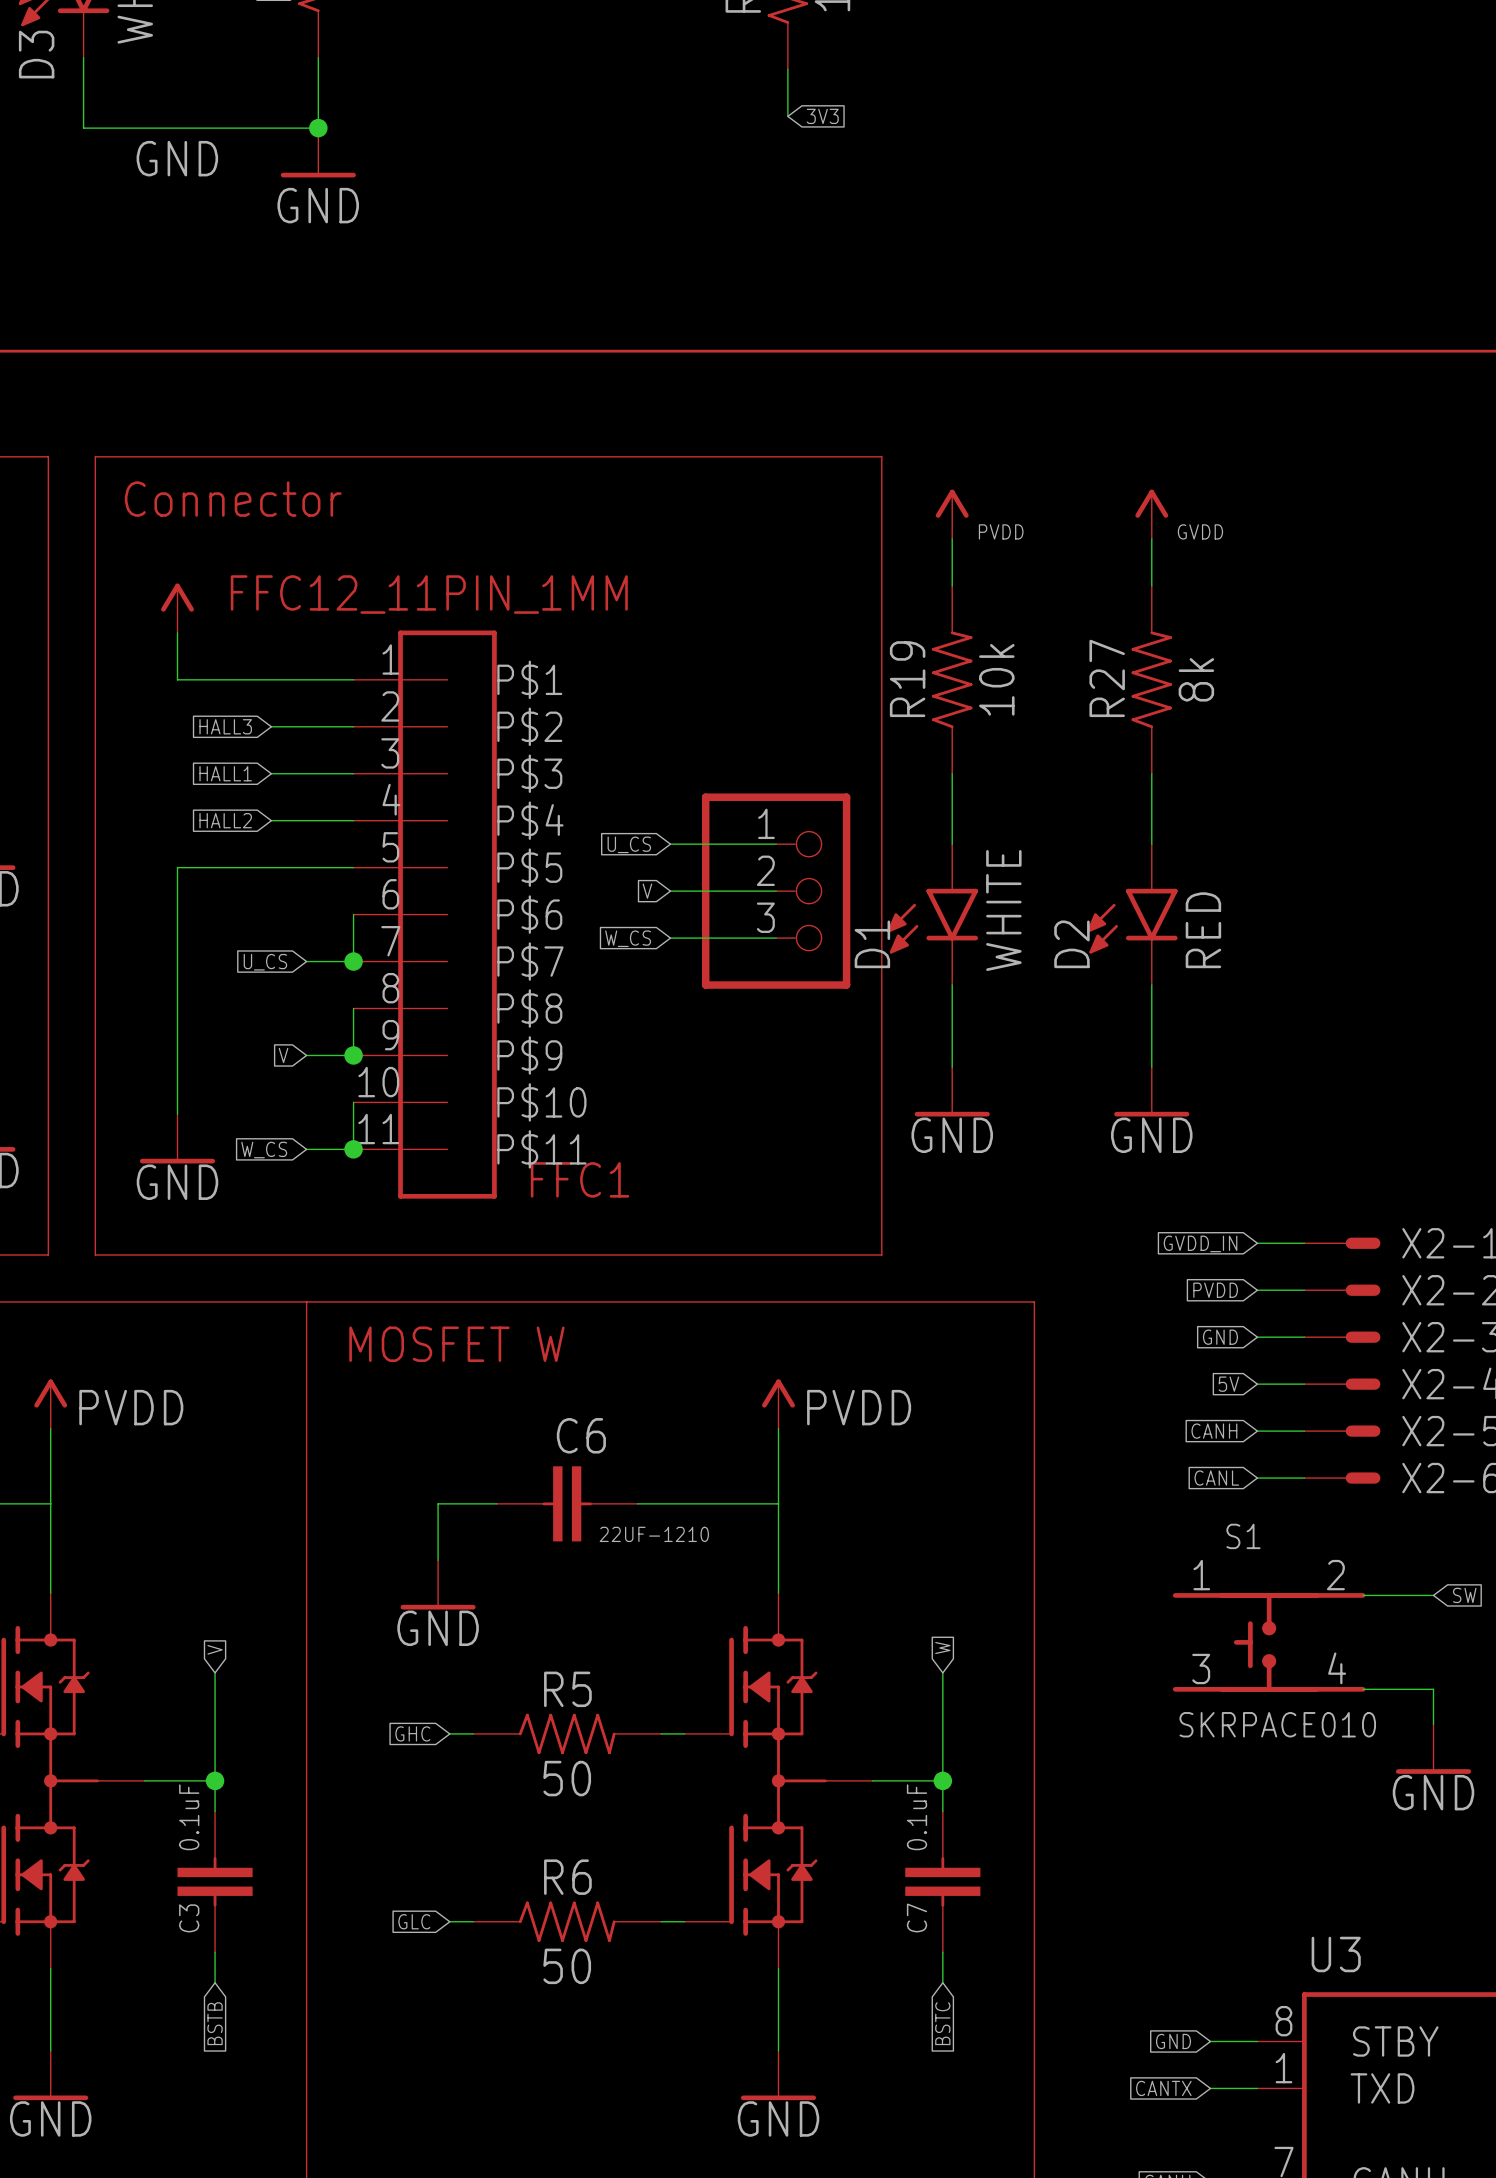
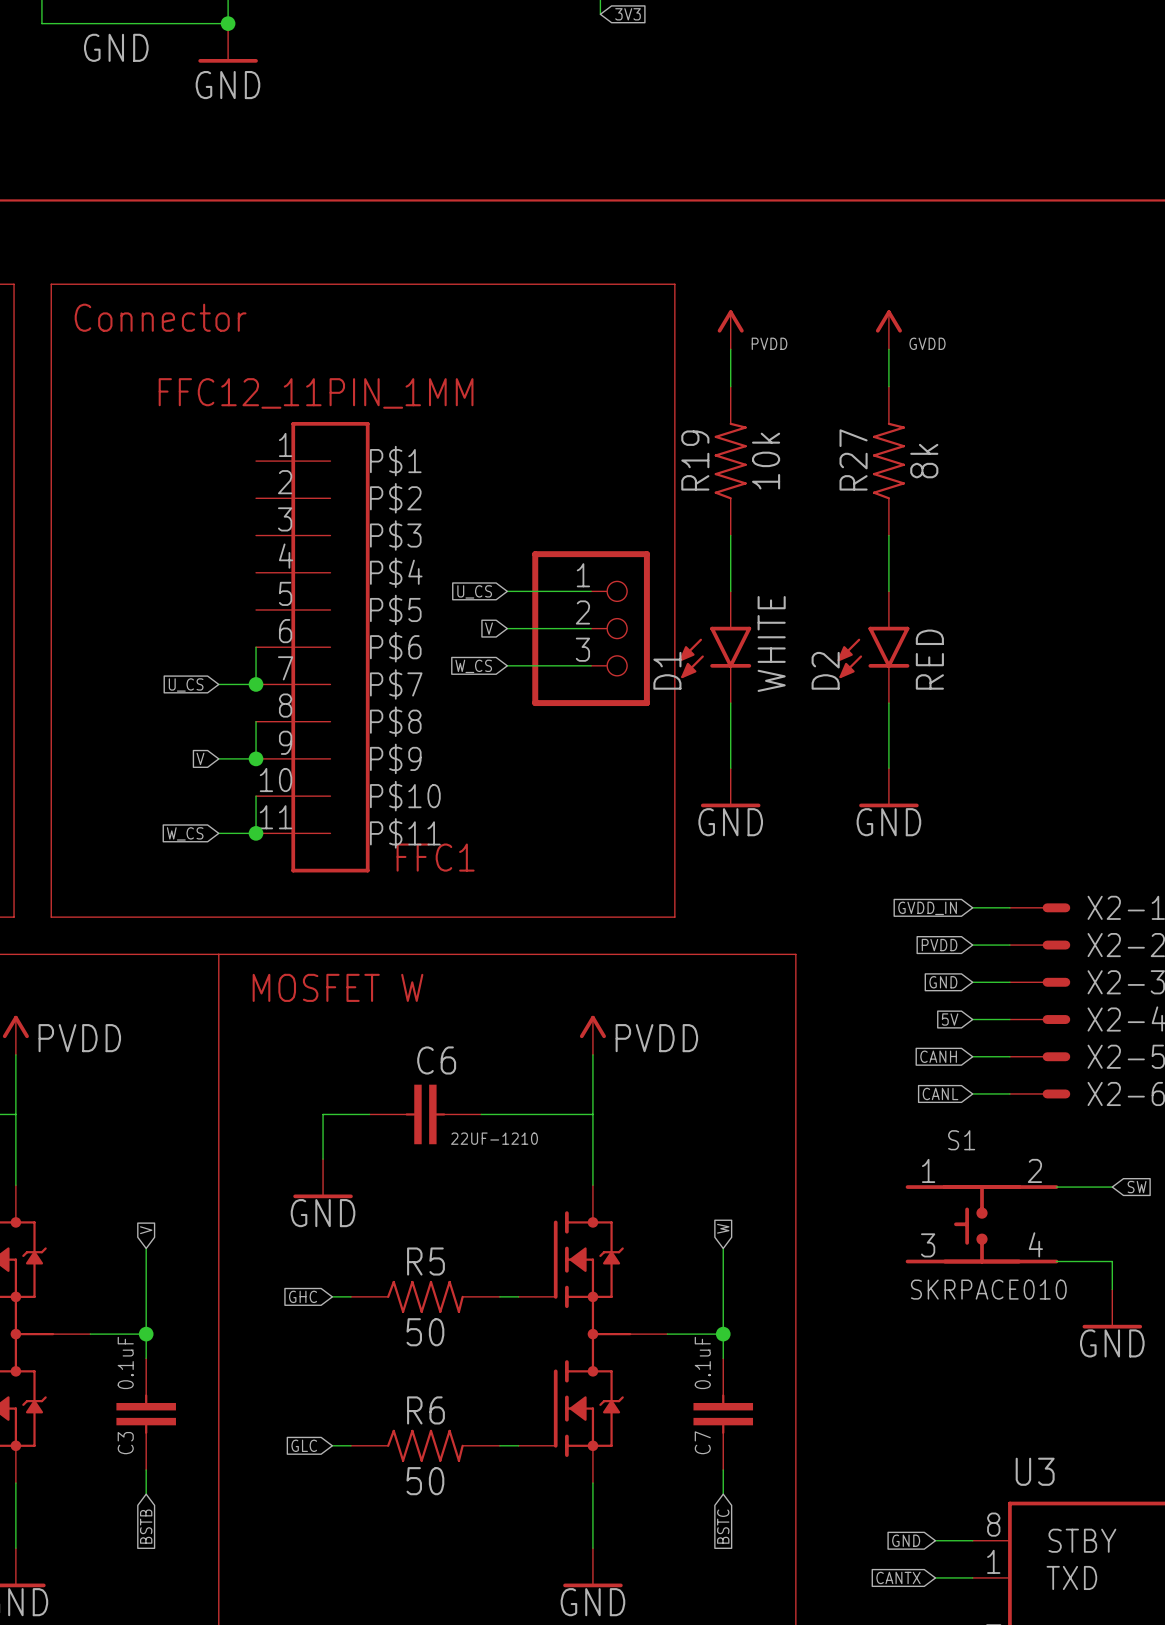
power symbol: (177, 608) -> none
wire: (177, 632) (177, 679) (353, 679) -> none
global label: HALL3 (225, 726) -> none
wire: (271, 726) (353, 726) -> none
global label: HALL1 (225, 773) -> none
wire: (271, 773) (353, 773) -> none
global label: HALL2 (225, 820) -> none
wire: (271, 820) (353, 820) -> none
wire: (353, 867) (177, 867) (177, 1114) -> none
power symbol: GND (177, 1138) -> none

